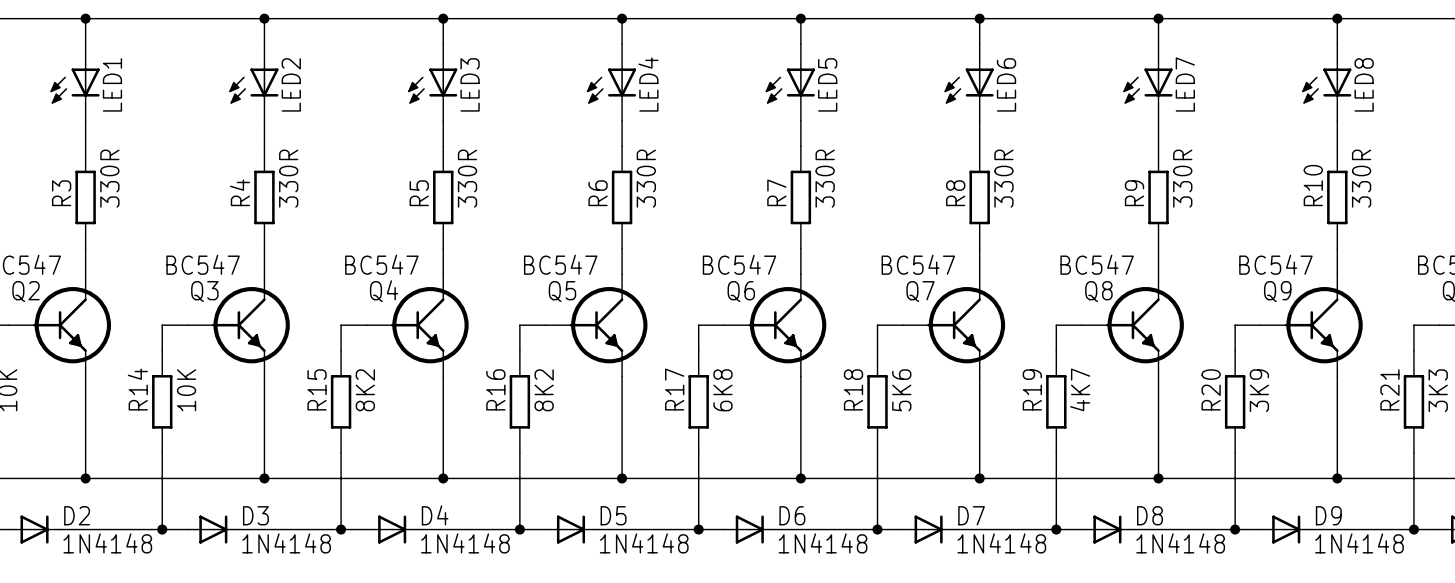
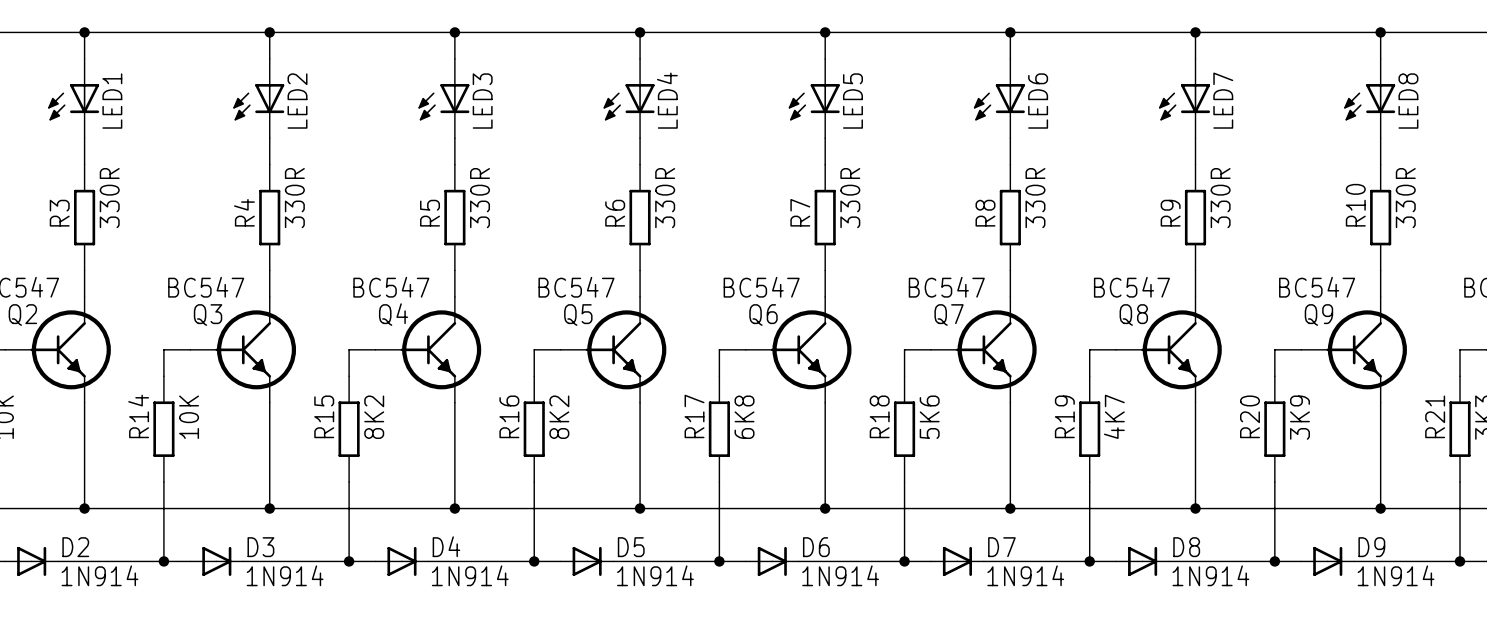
D2 value: 1N4148 (107, 543) -> 1N914 (99, 575)
D3 value: 1N4148 (286, 543) -> 1N914 (285, 575)
D4 value: 1N4148 (465, 543) -> 1N914 (470, 575)
D5 value: 1N4148 (644, 543) -> 1N914 (655, 575)
D6 value: 1N4148 (823, 543) -> 1N914 (840, 575)
D7 value: 1N4148 (1001, 543) -> 1N914 (1025, 575)
D8 value: 1N4148 (1180, 543) -> 1N914 (1210, 575)
D9 value: 1N4148 (1359, 543) -> 1N914 (1396, 575)

